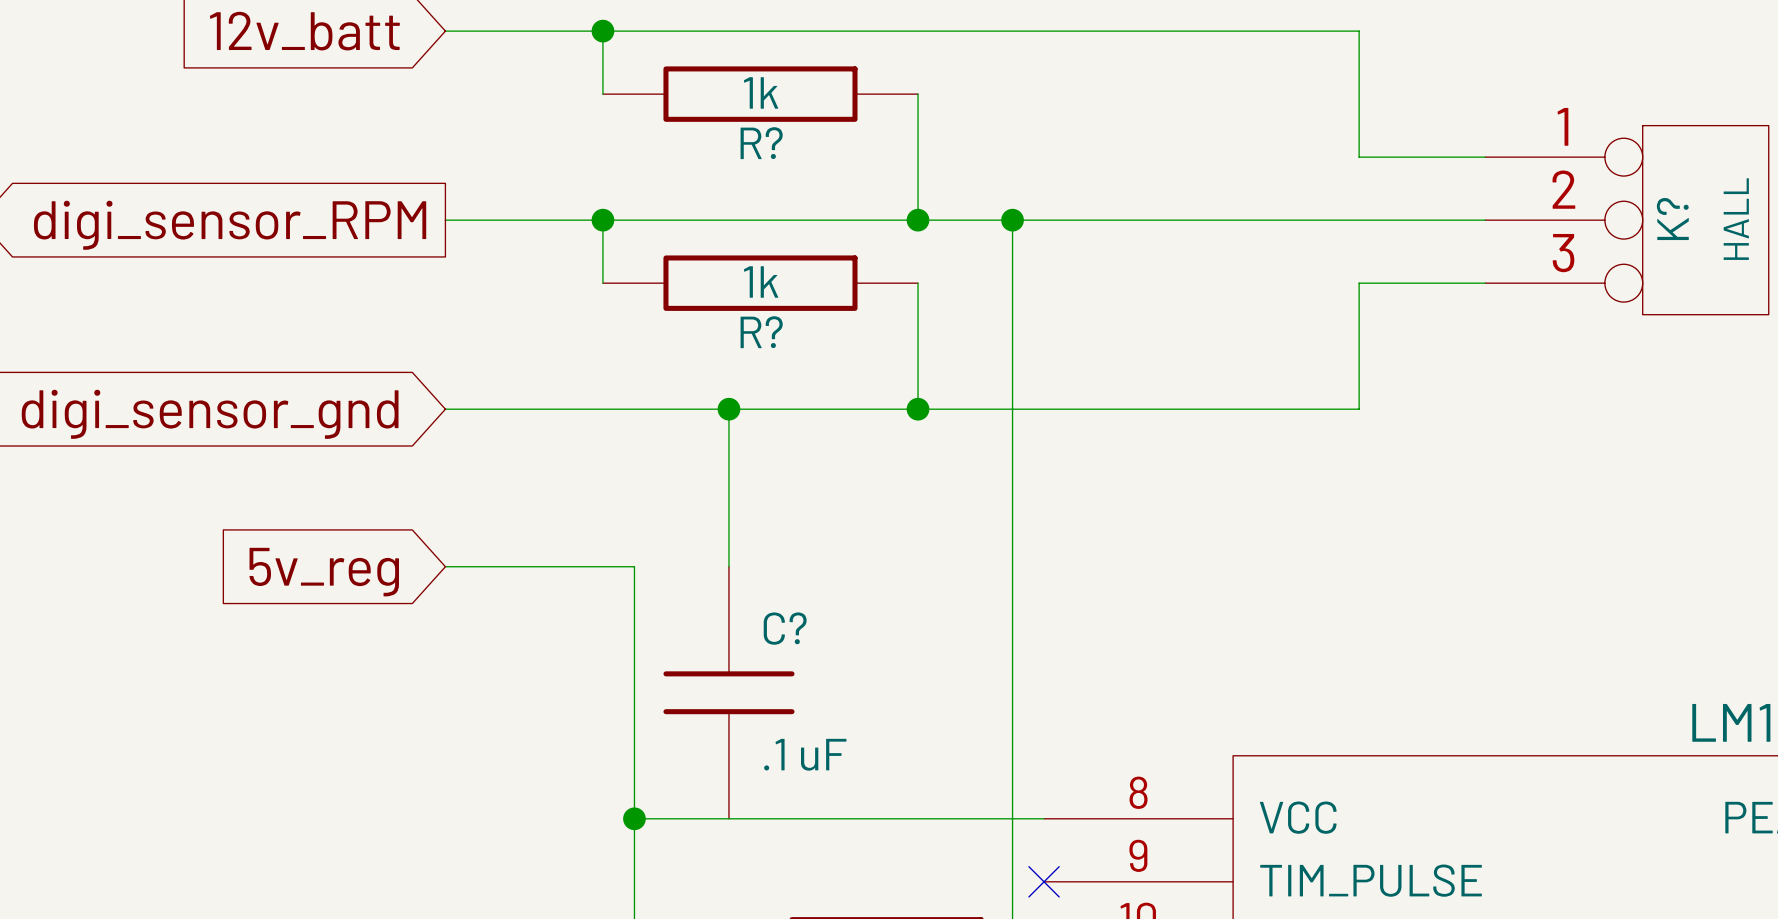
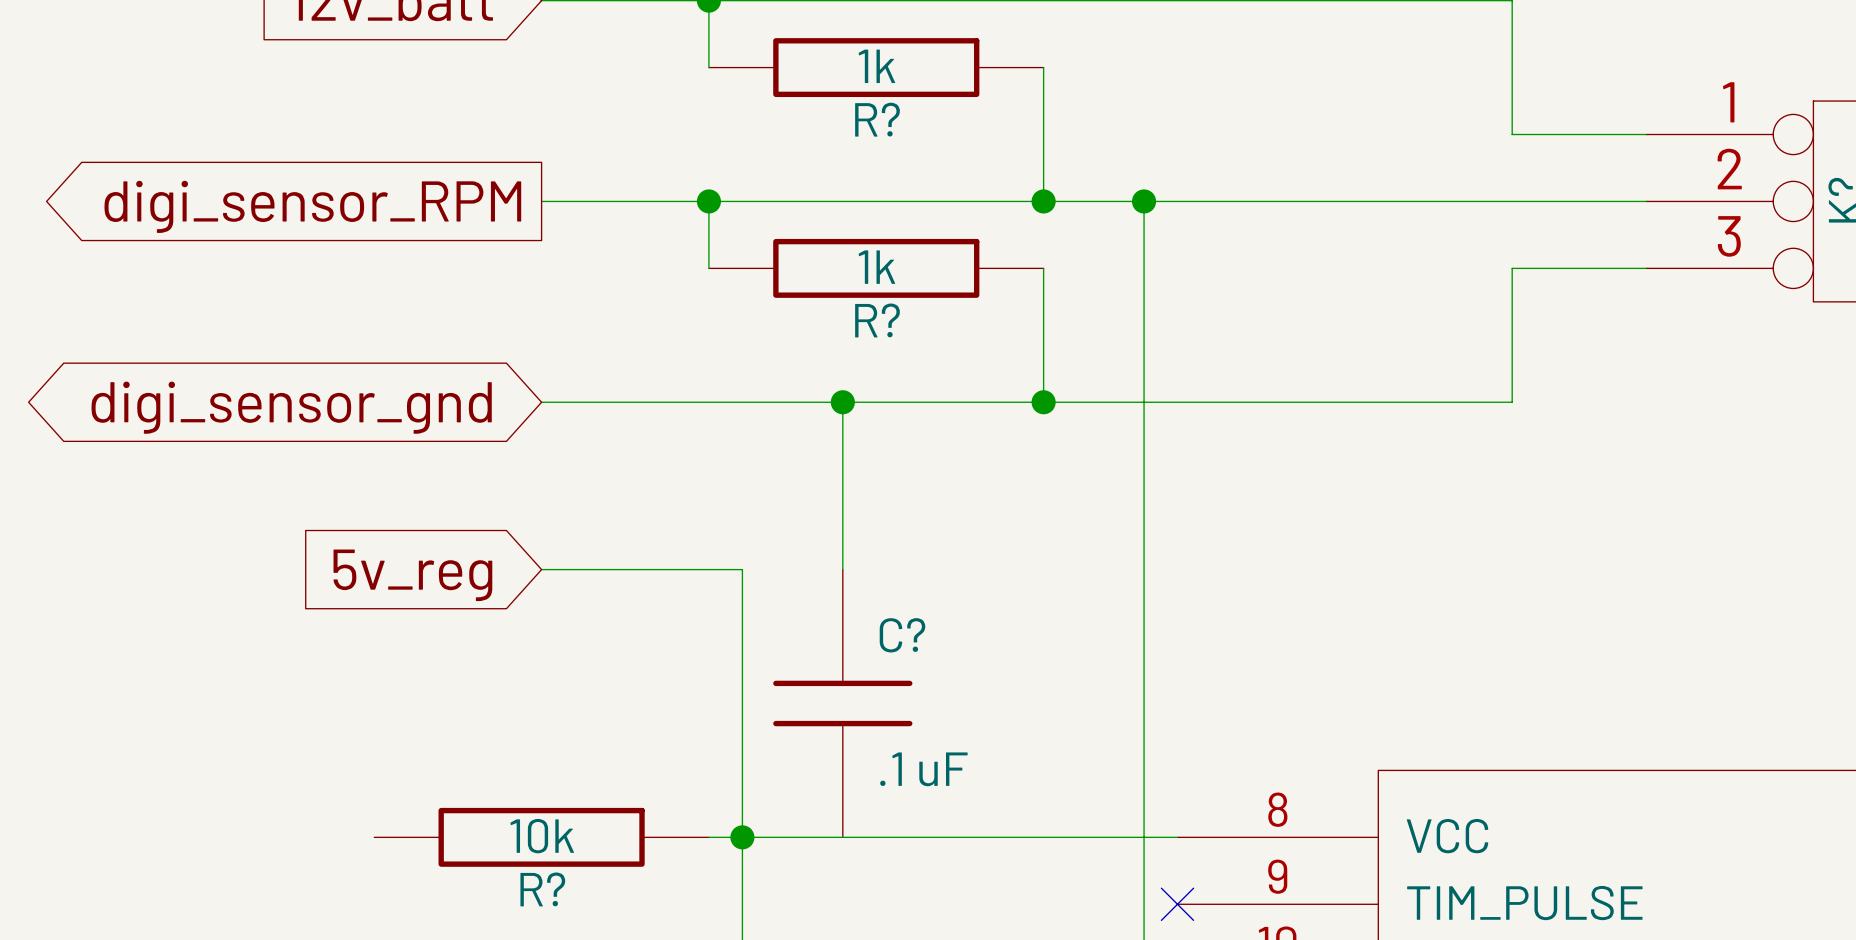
R?: none -> 10k (541, 837)
wire: none -> (708, 837) (742, 837)

